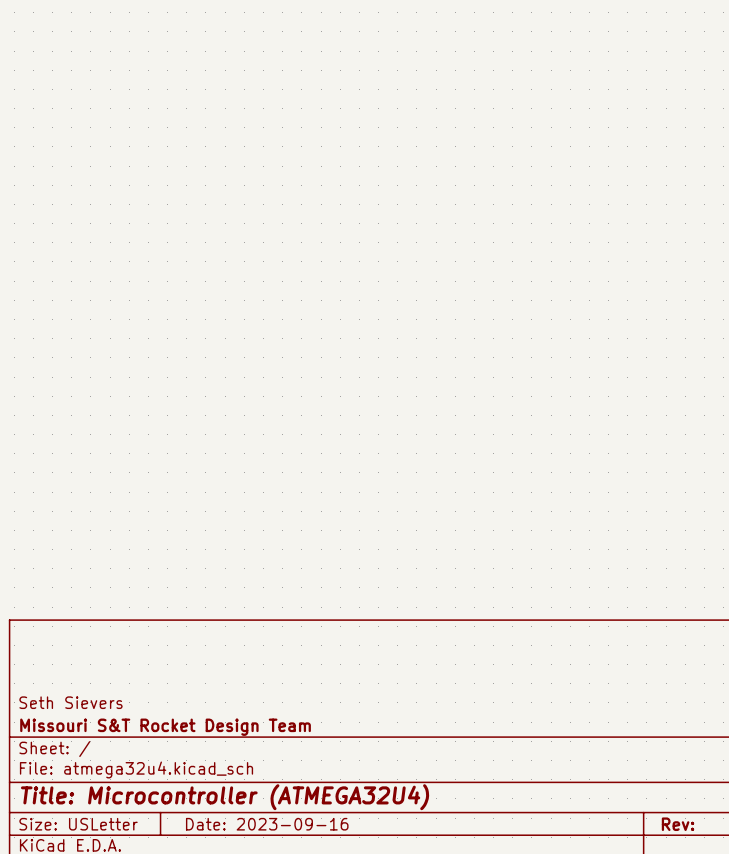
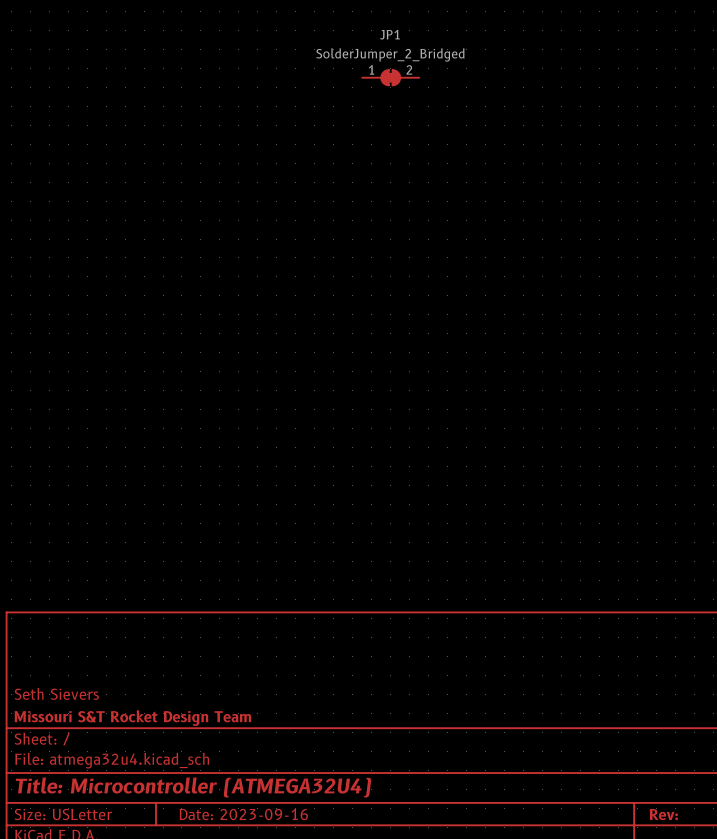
JP1: none -> SolderJumper_2_Bridged (390, 77)

